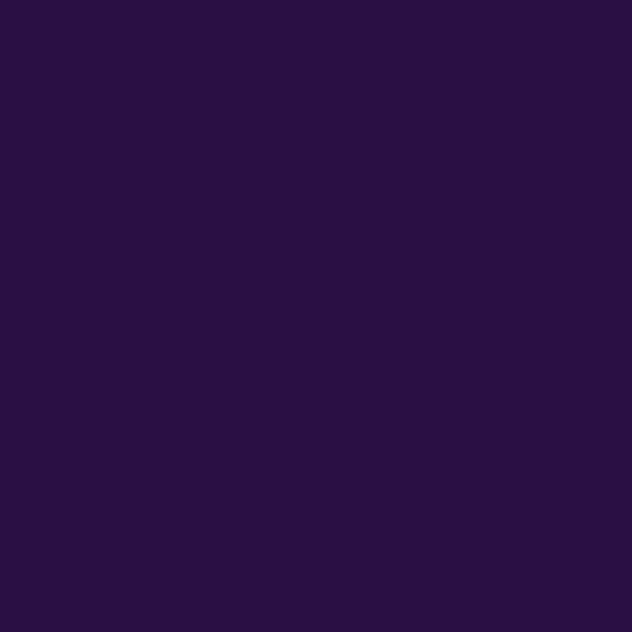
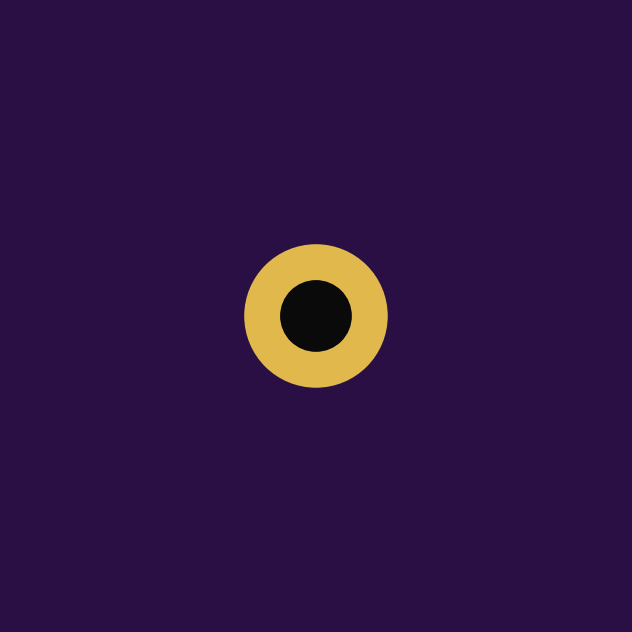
part: none -> (315, 315)

